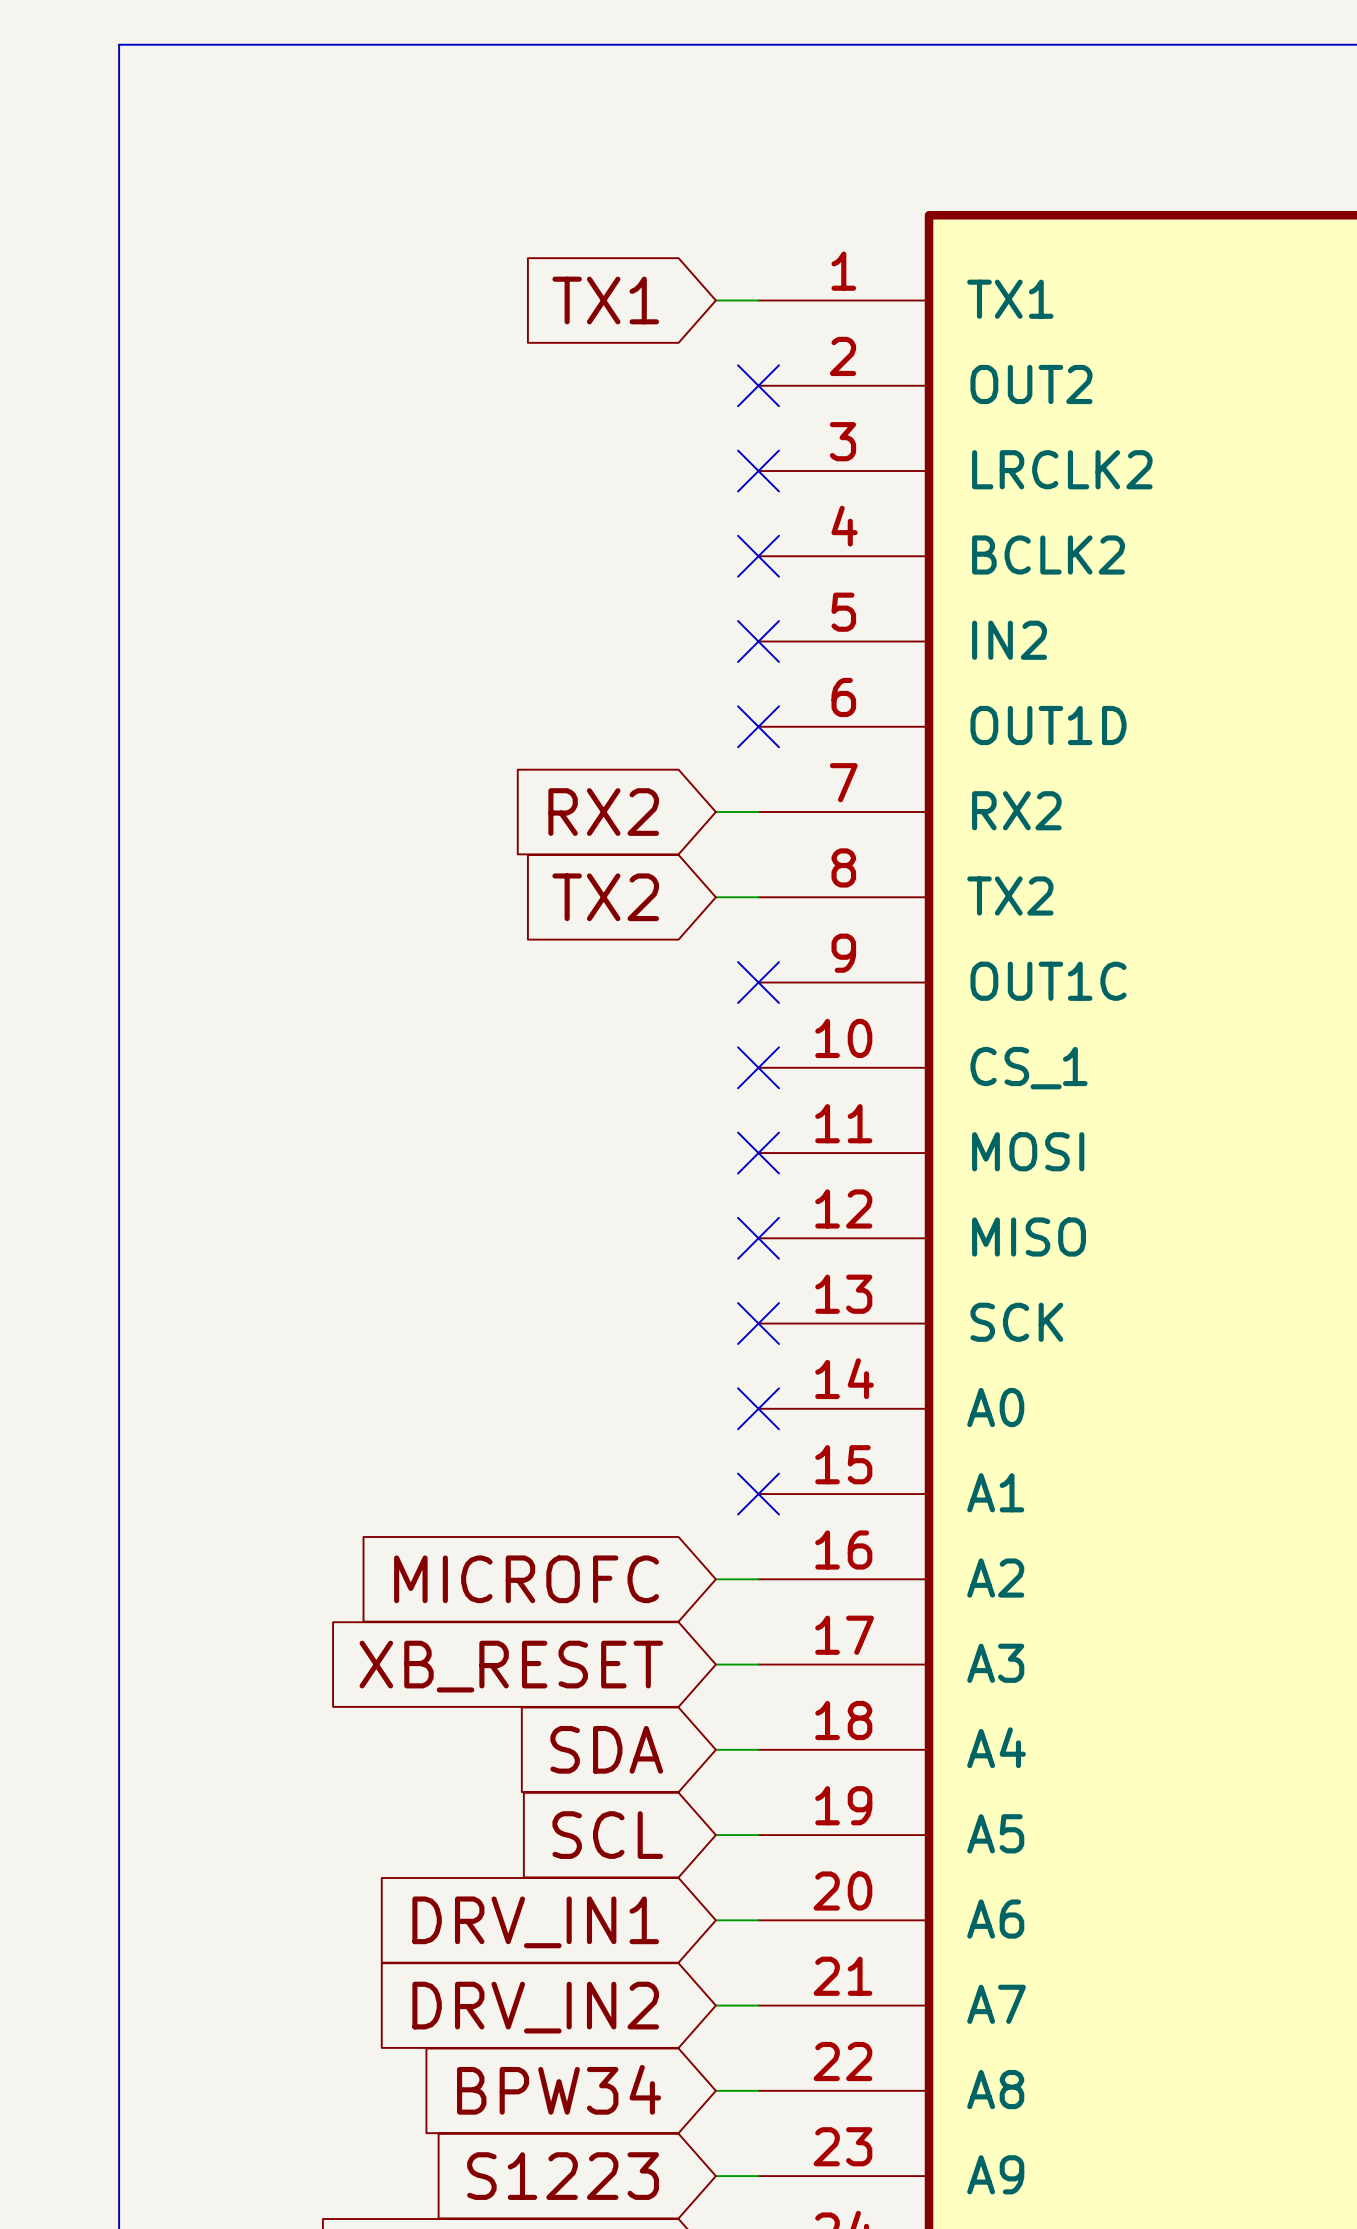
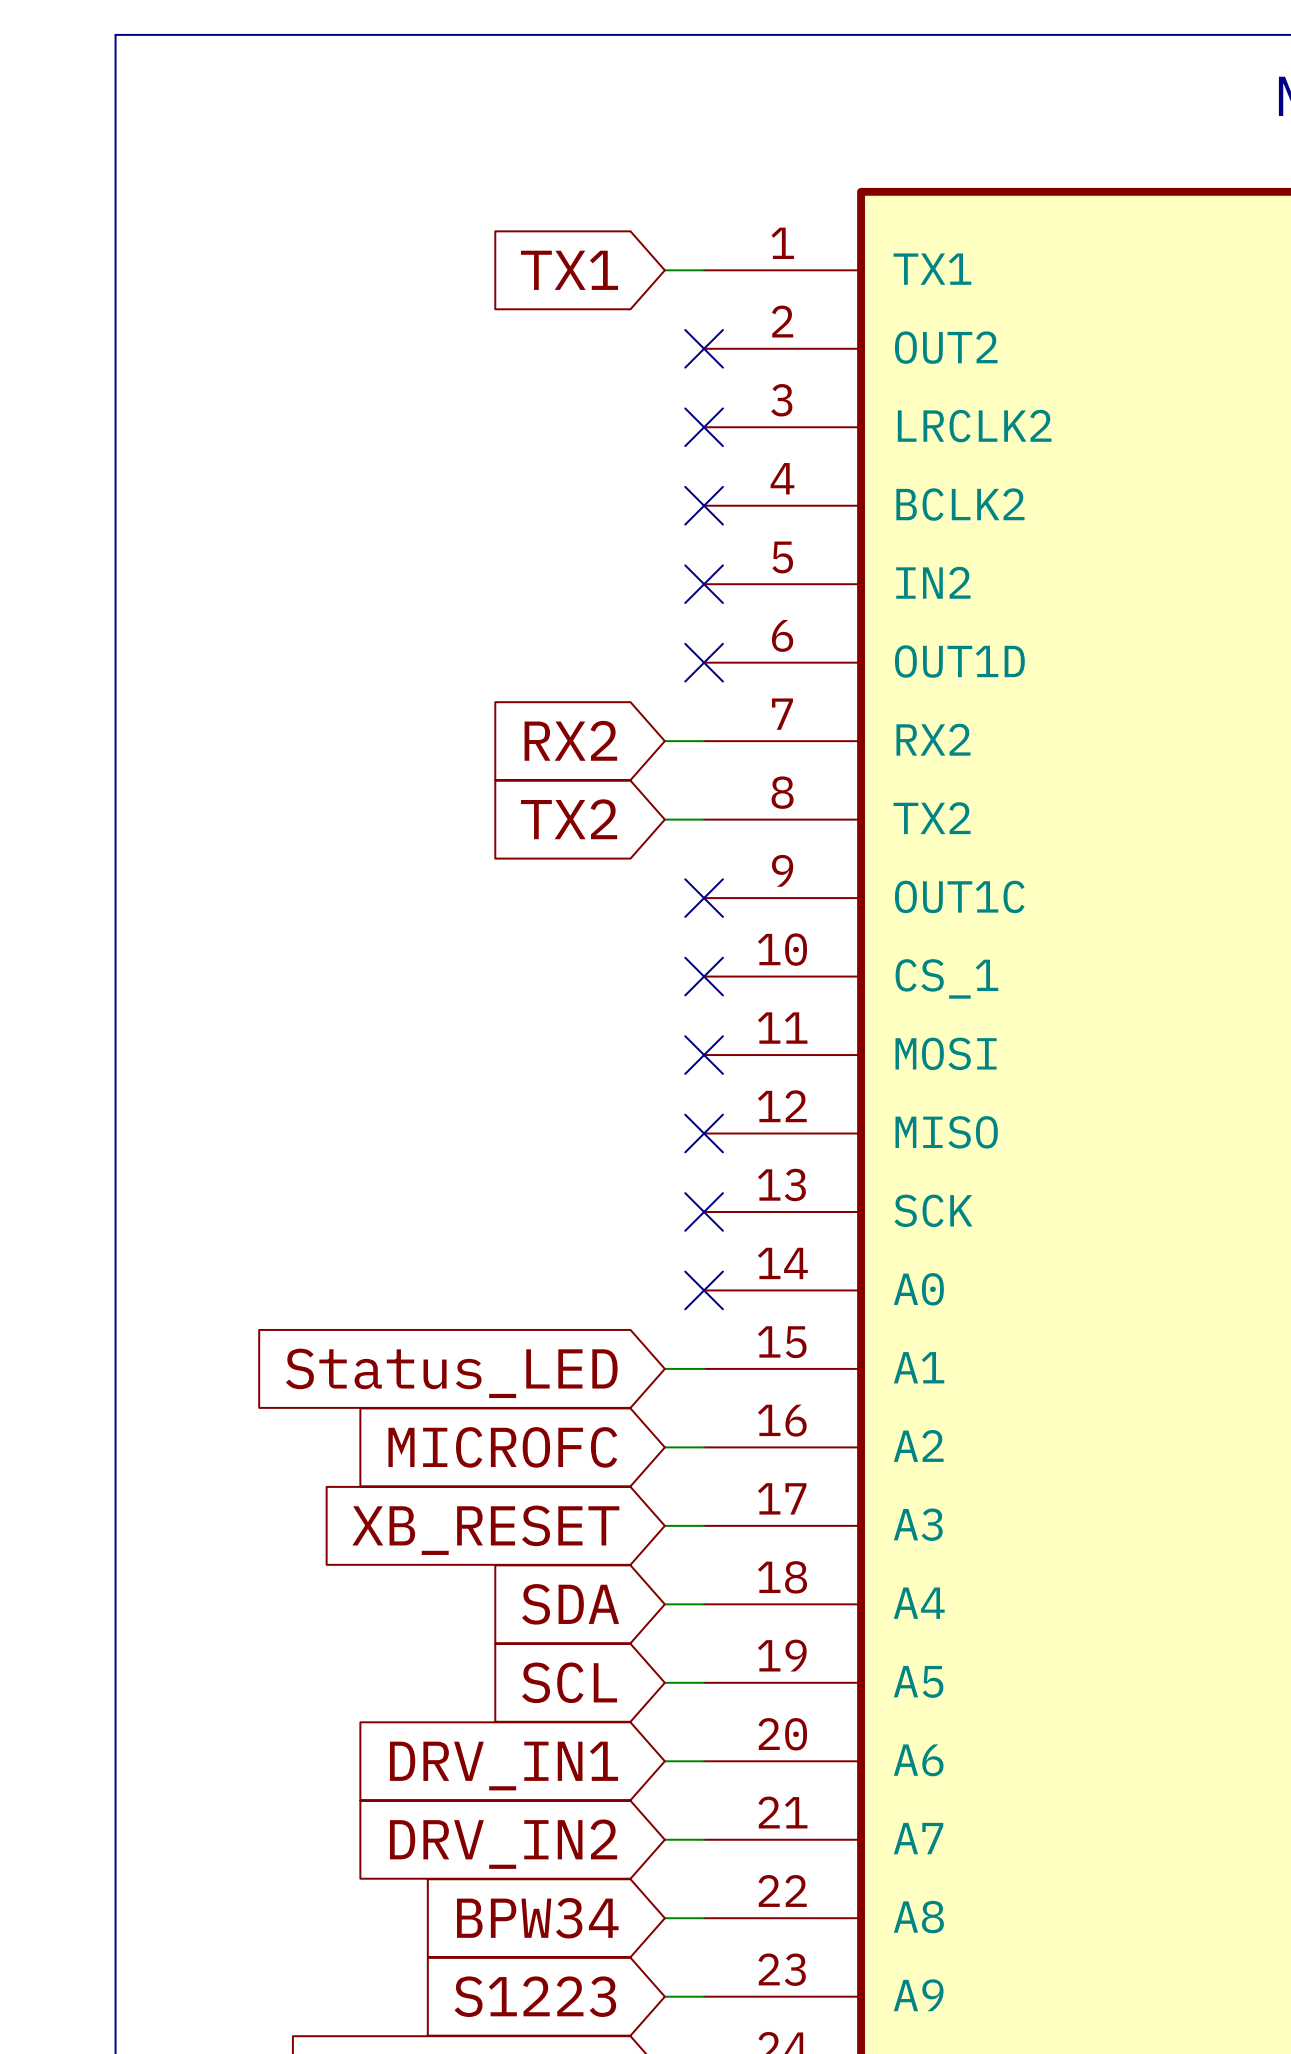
wire: none -> (664, 1368) (704, 1368)
no-connect mark: (758, 1494) -> none
global label: none -> Status_LED (451, 1373)

